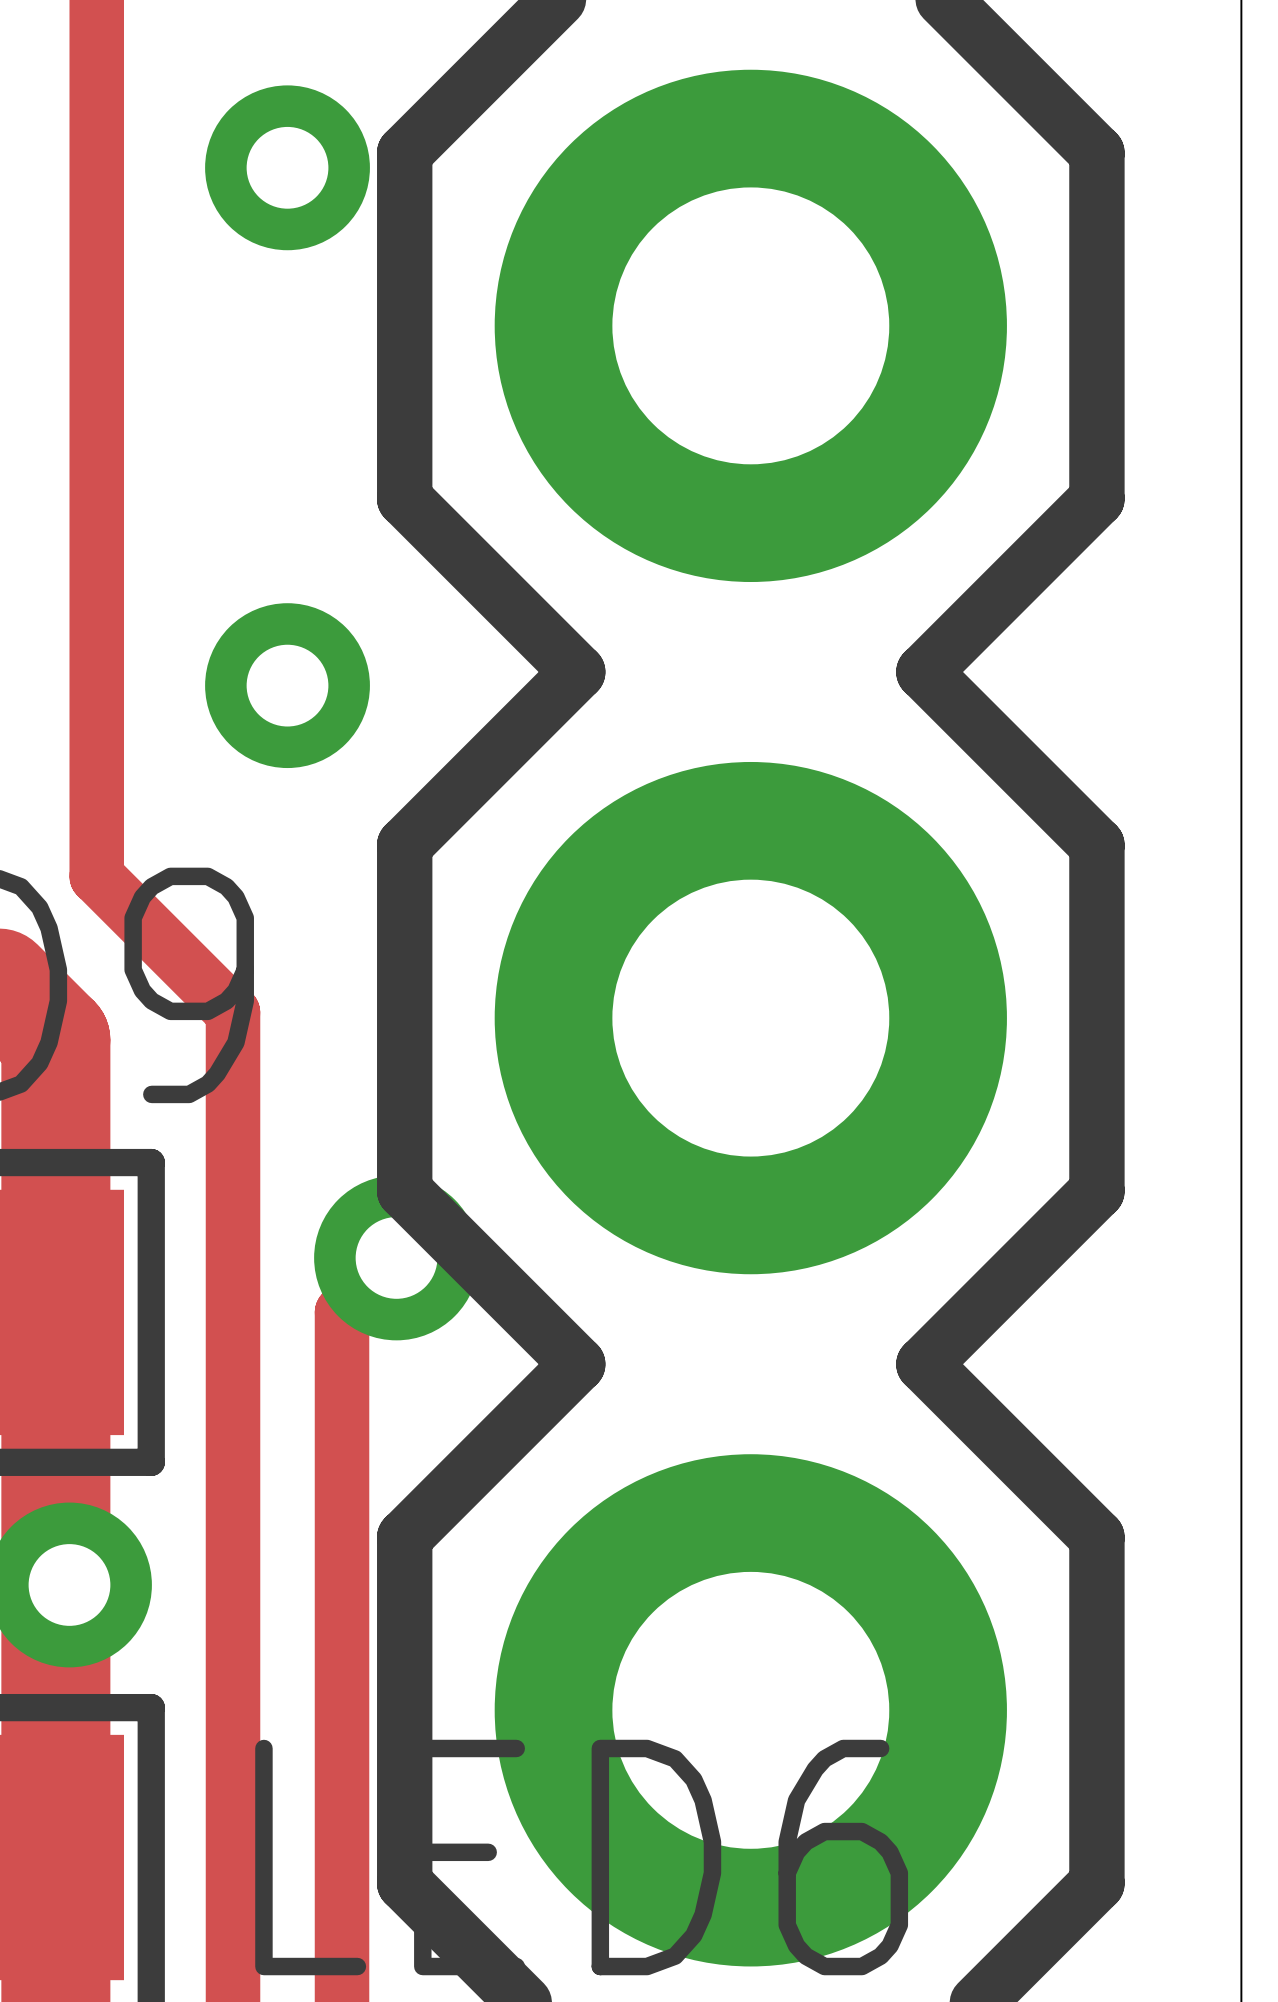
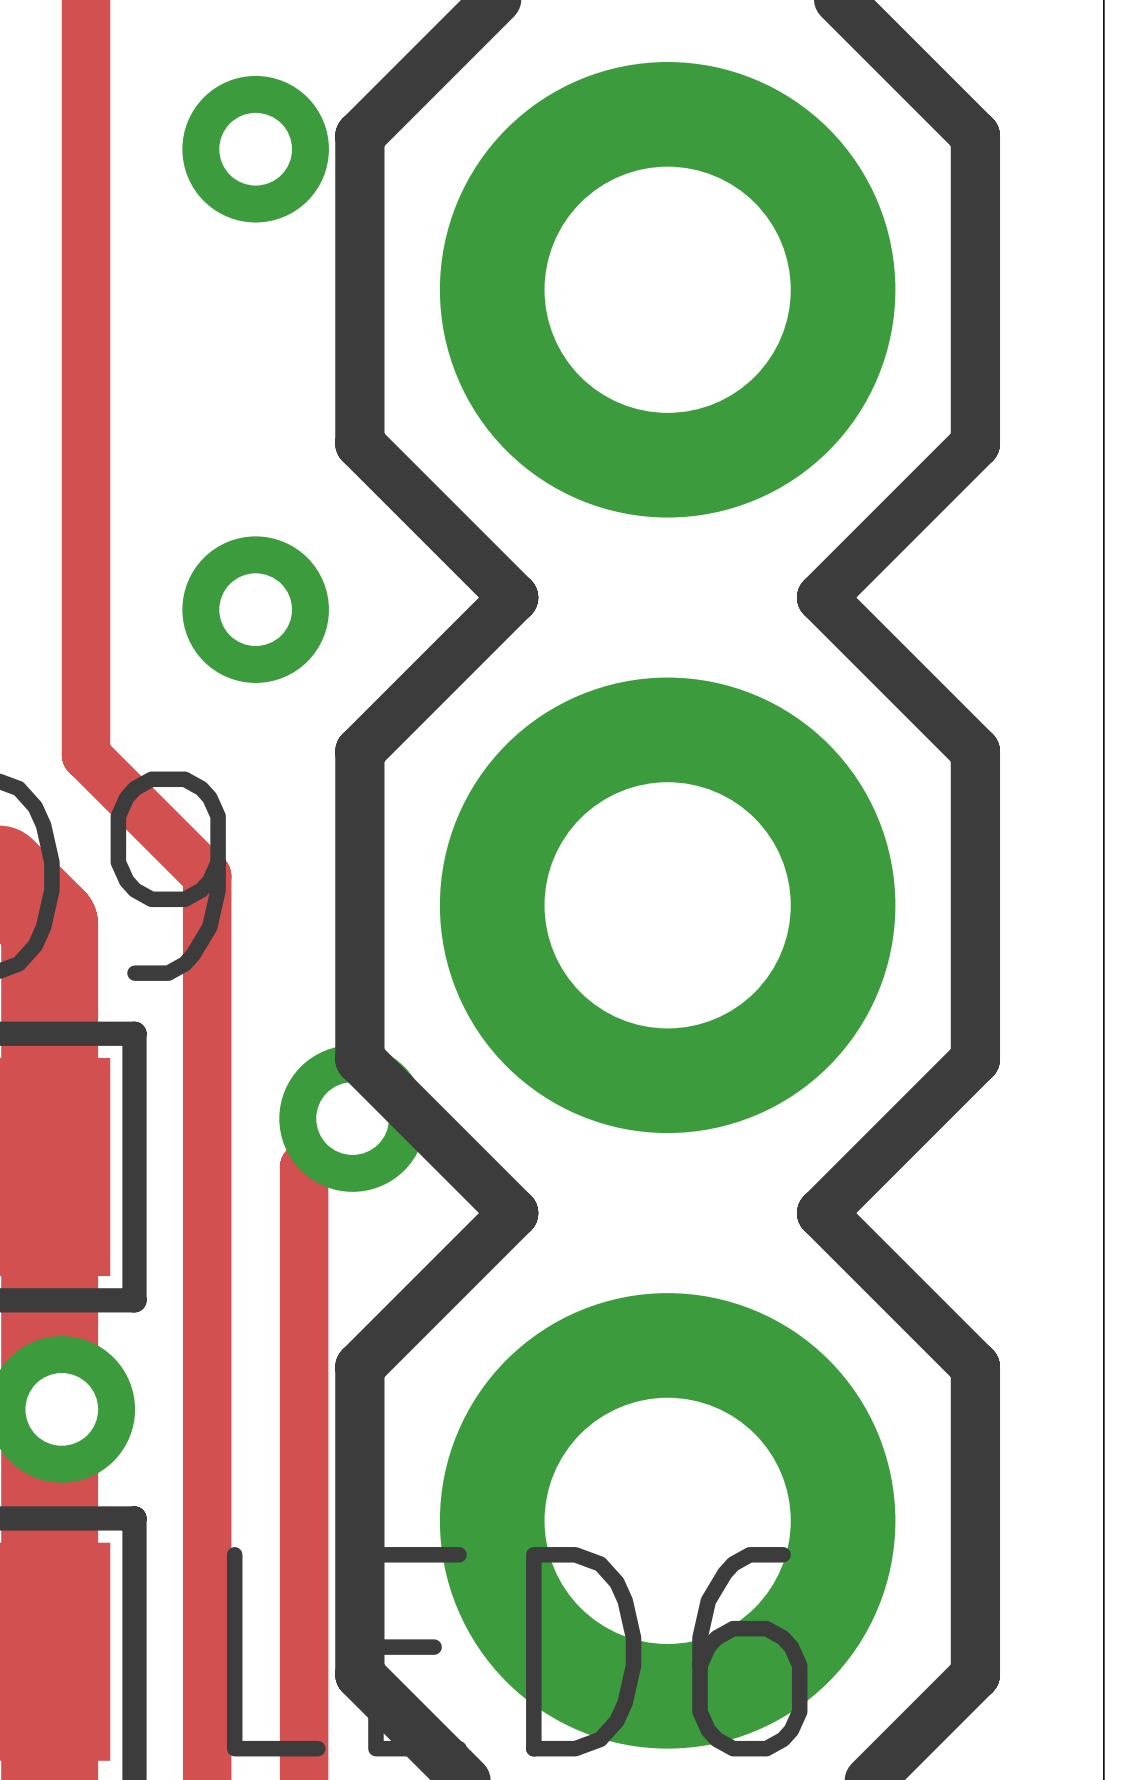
track: (96, 849) (96, 876) (233, 1012) -> (86, 755) (207, 876) (207, 900)

